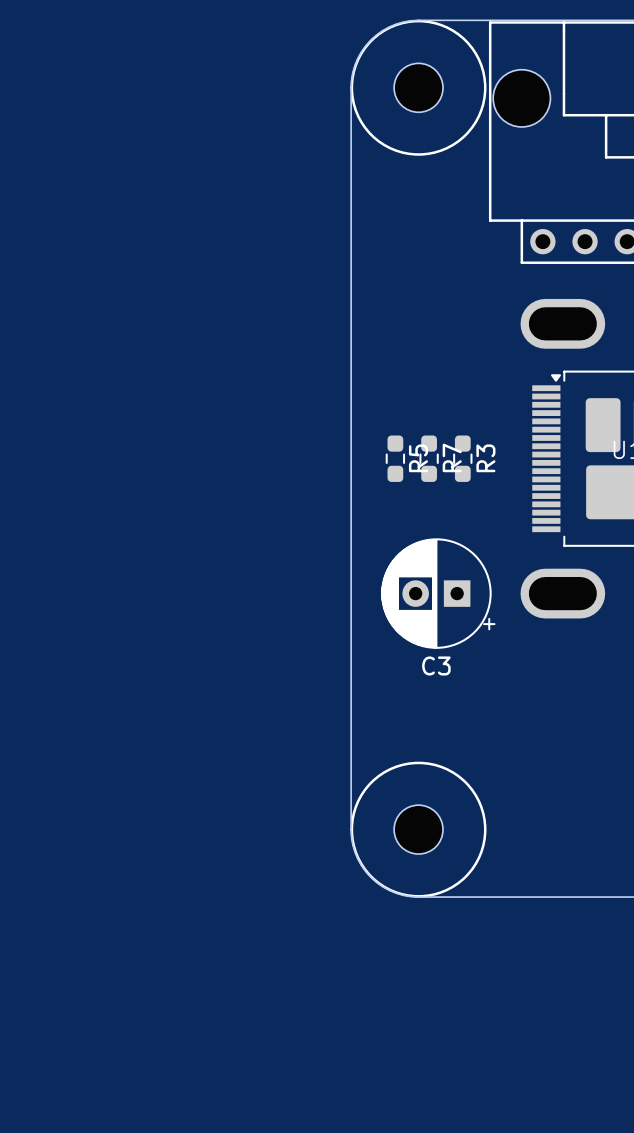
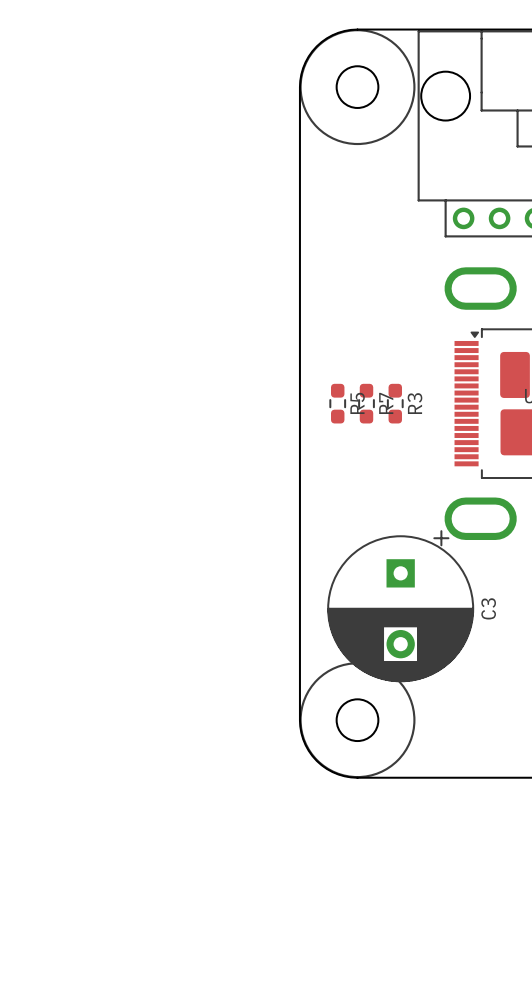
C3 footprint: [381, 538, 496, 649] -> [327, 530, 475, 683]
C3 name position: C3 (436, 665) -> C3 (488, 608)

